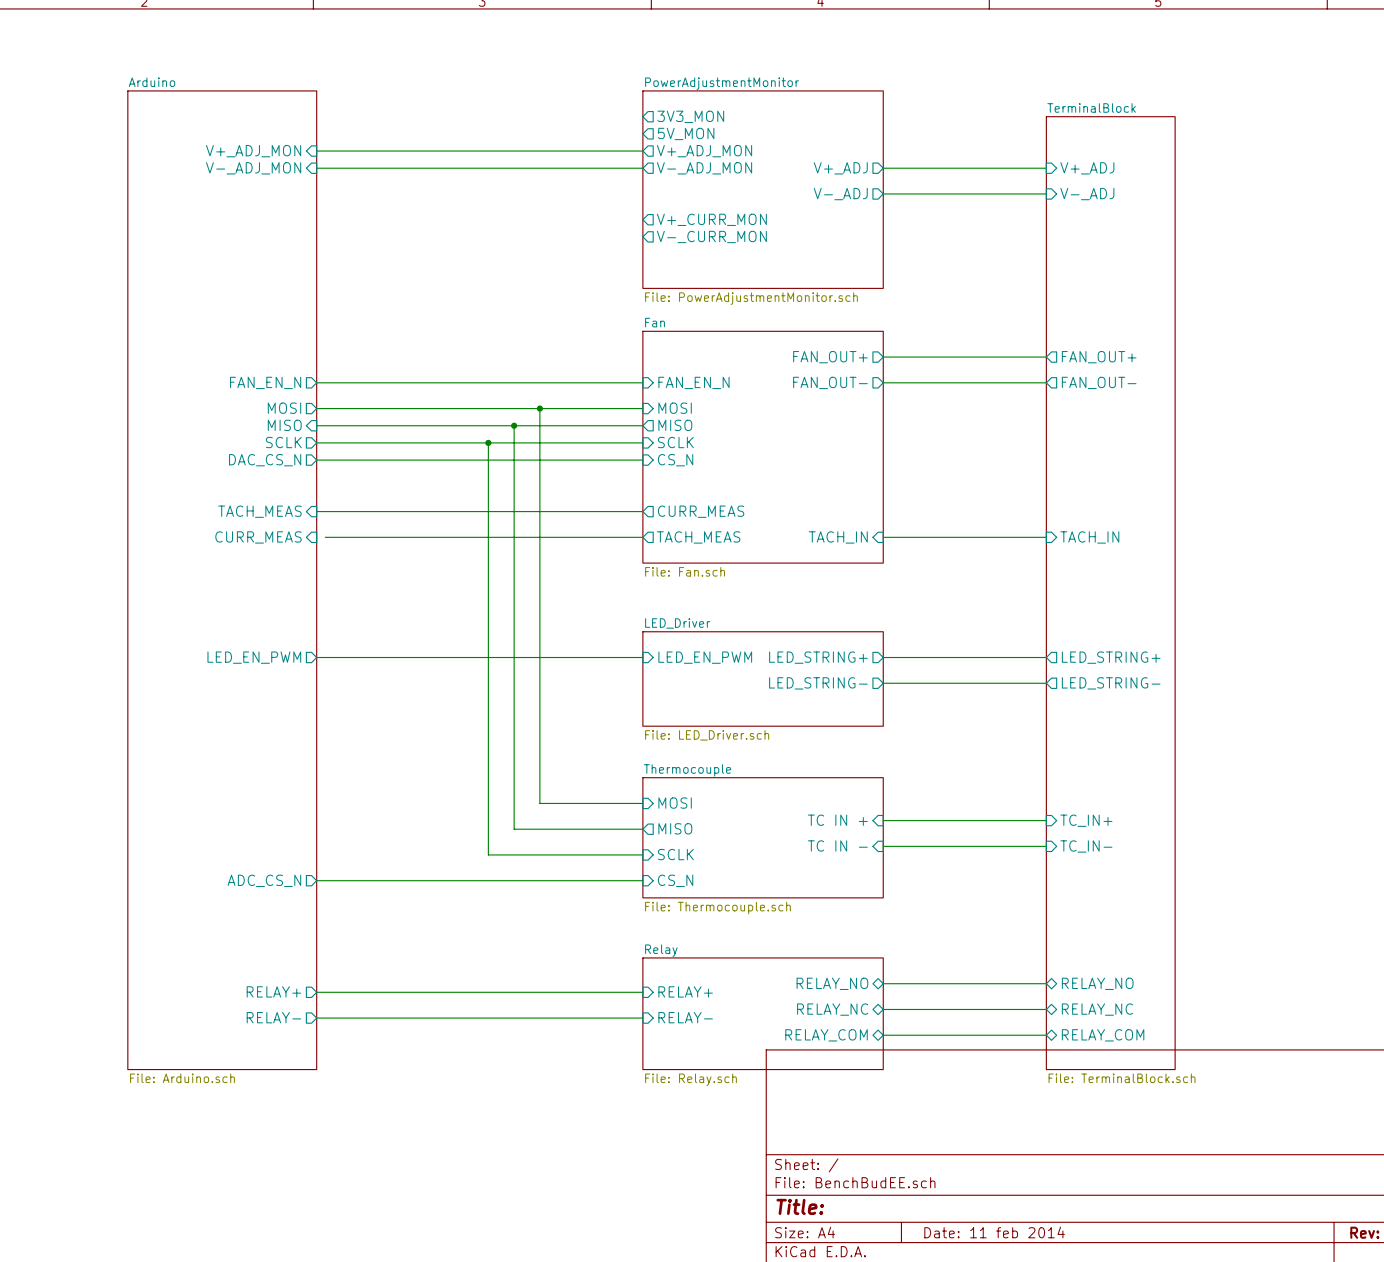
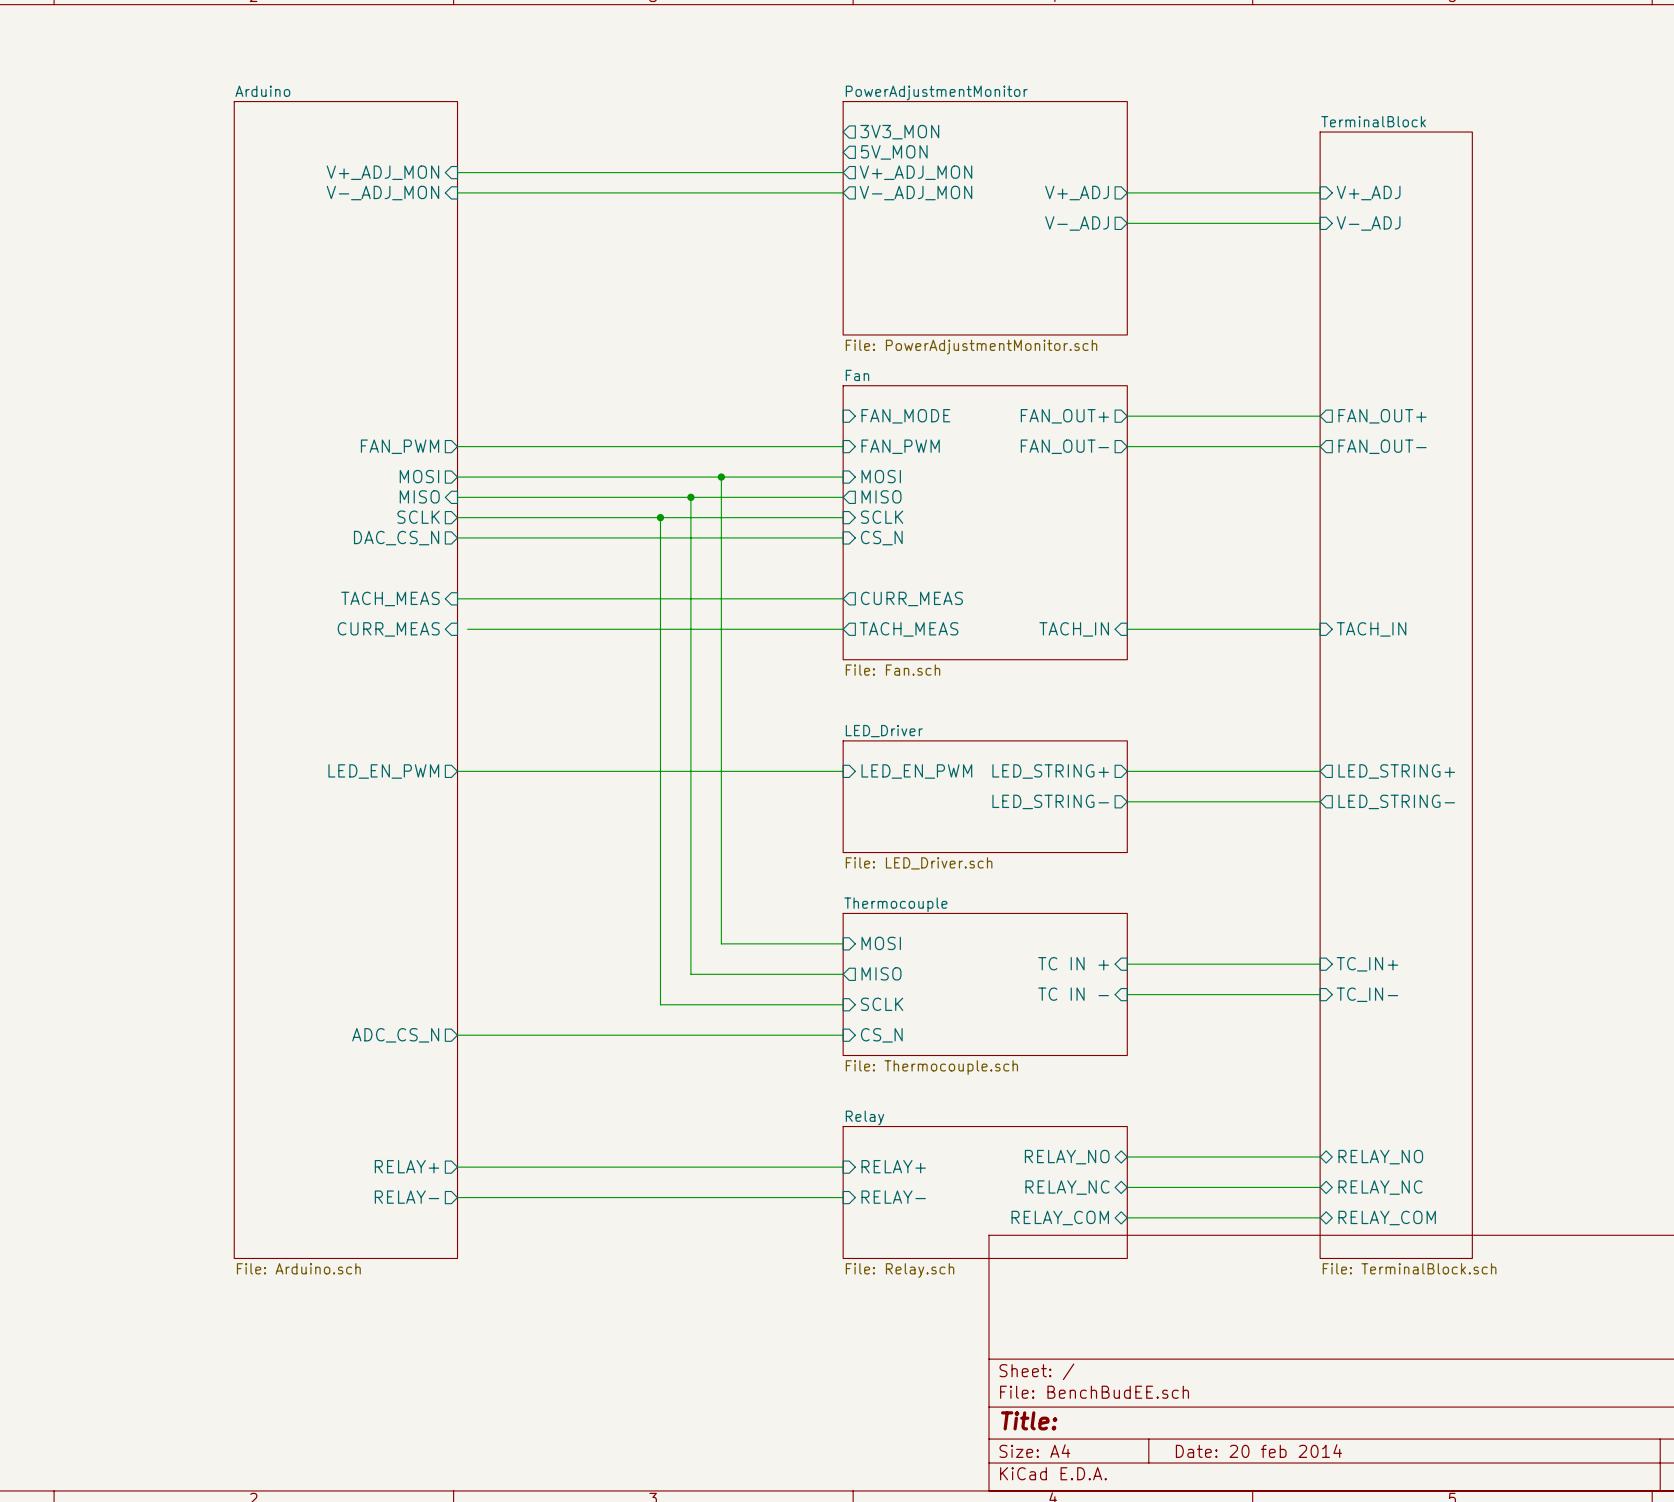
sheet pin: V+_CURR_MON (711, 219) -> none
sheet pin: V-_CURR_MON (711, 236) -> none
sheet pin: none -> FAN_MODE (905, 416)
sheet pin: FAN_EN_N (265, 382) -> FAN_PWM (400, 446)
sheet pin: FAN_EN_N (693, 382) -> FAN_PWM (900, 446)
title block: Date: 11 feb 2014 (994, 1232) -> Date: 20 feb 2014 (1258, 1451)

